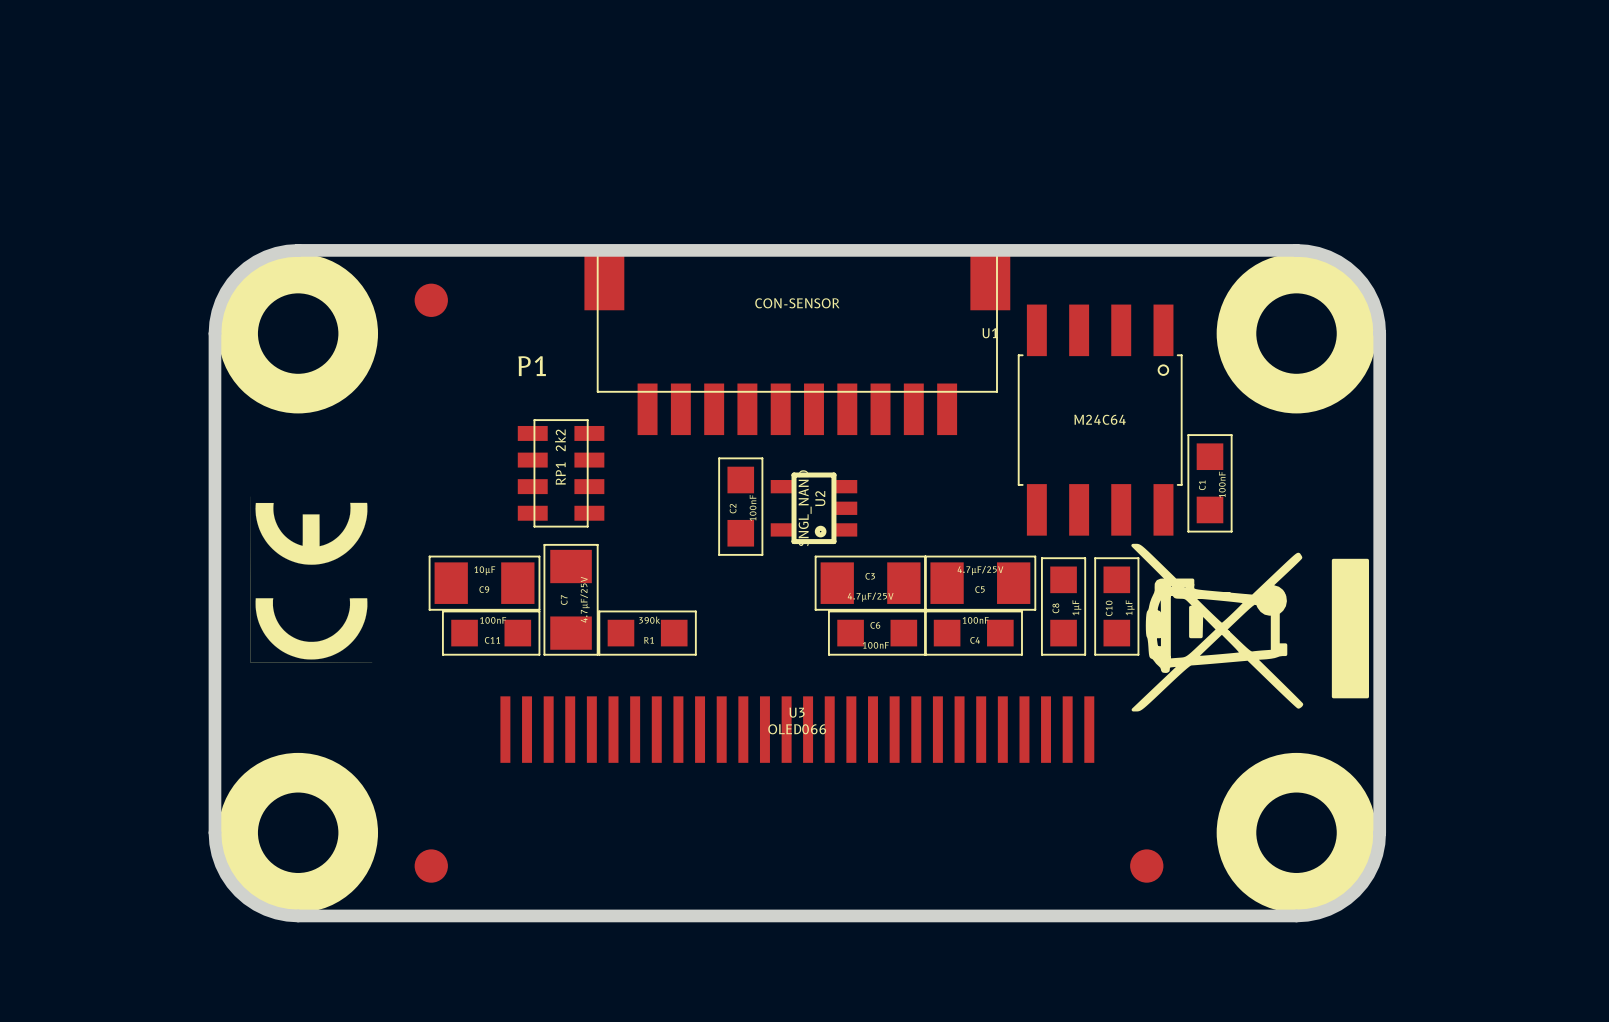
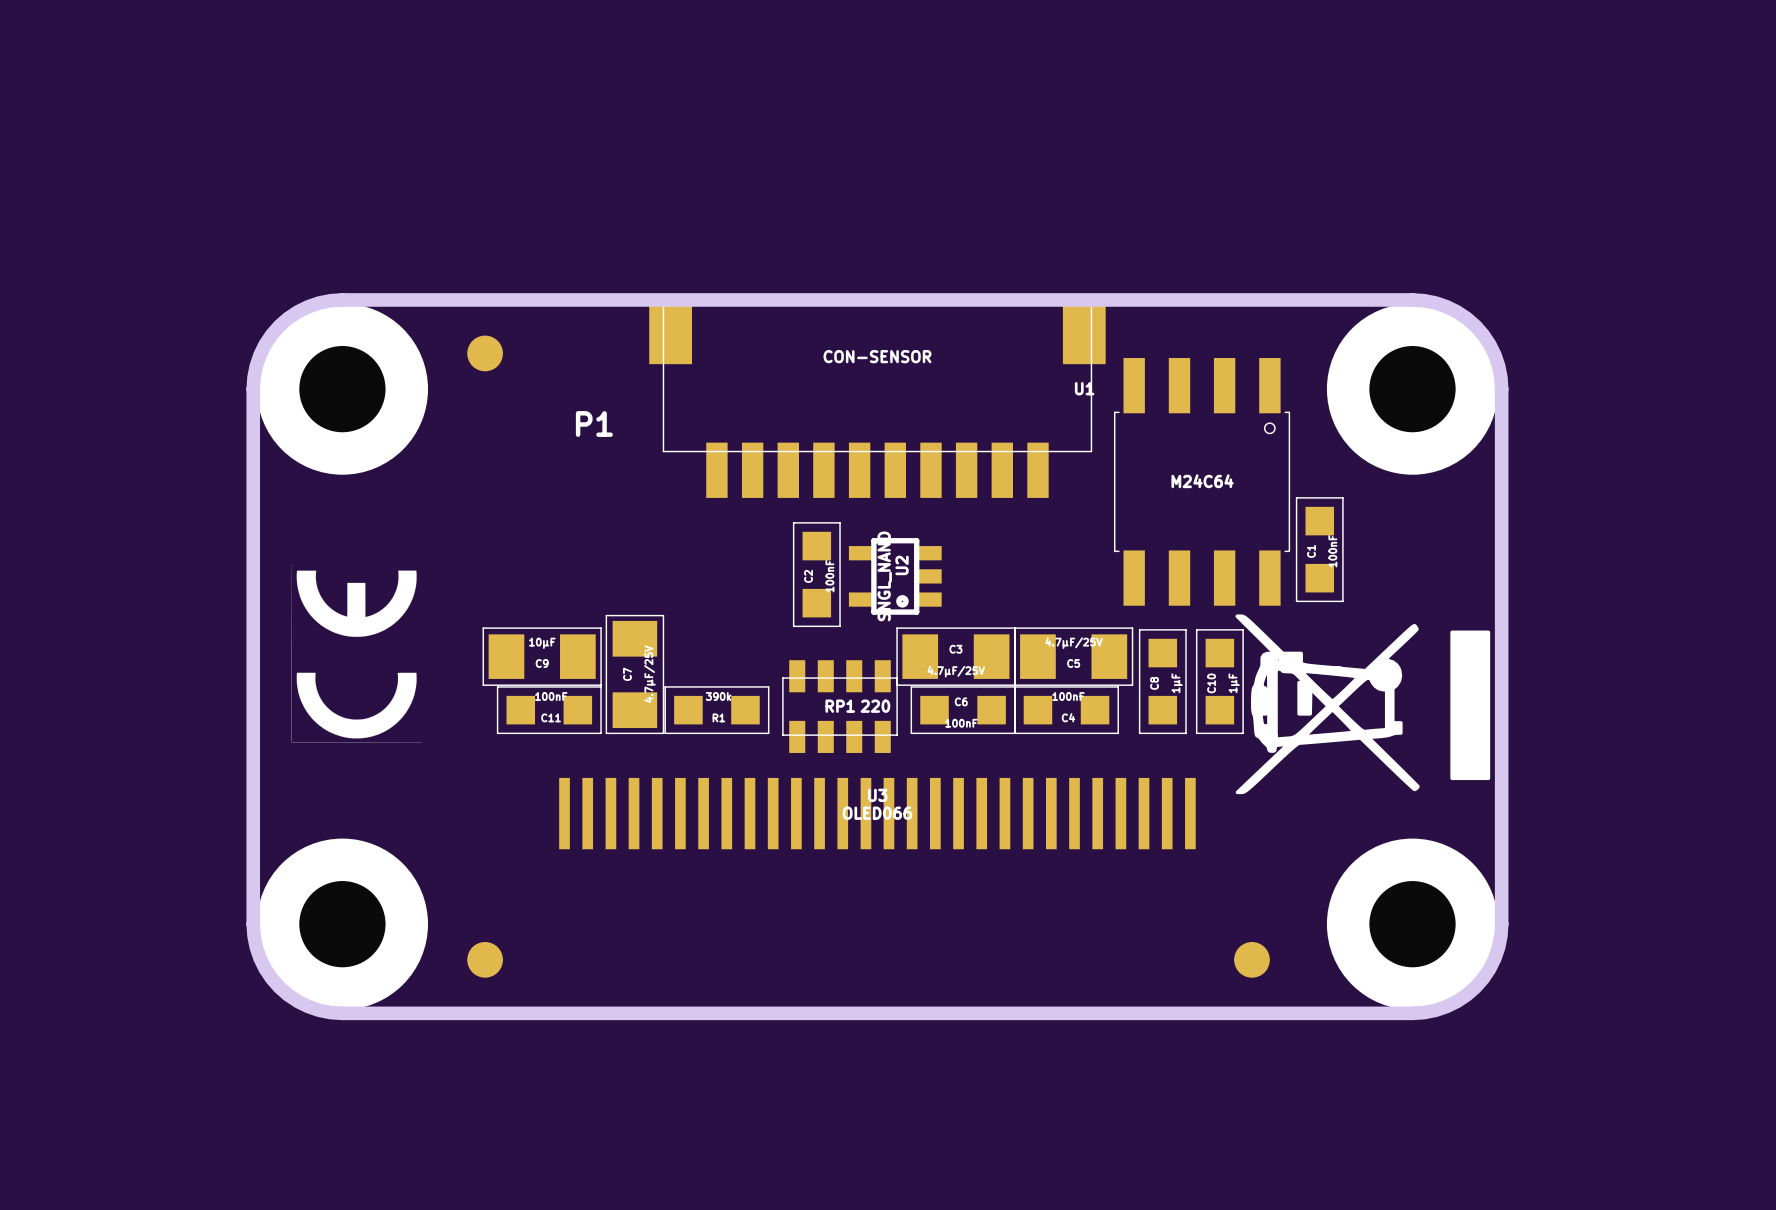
RP1 value: 2k2 (560, 440) -> 220 (875, 706)
RP1 rotation: 0° (561, 473) -> 90° clockwise (840, 706)
RP1 position: (561, 473) -> (840, 706)

